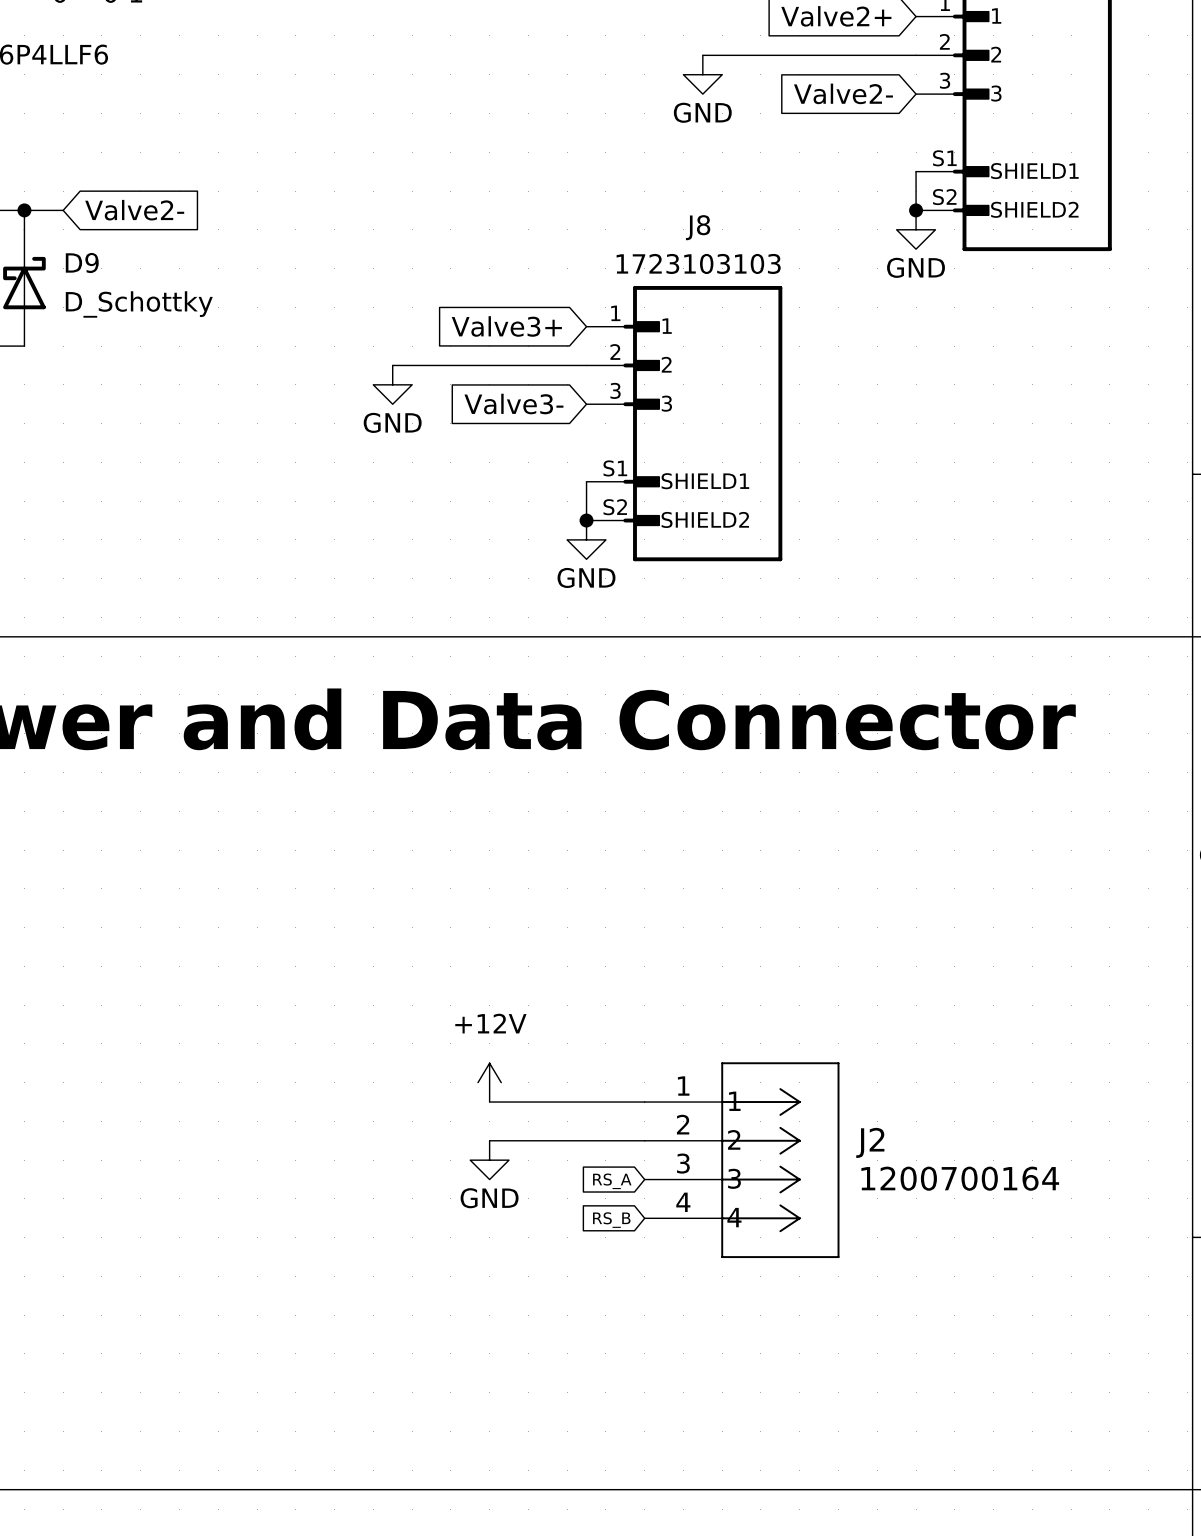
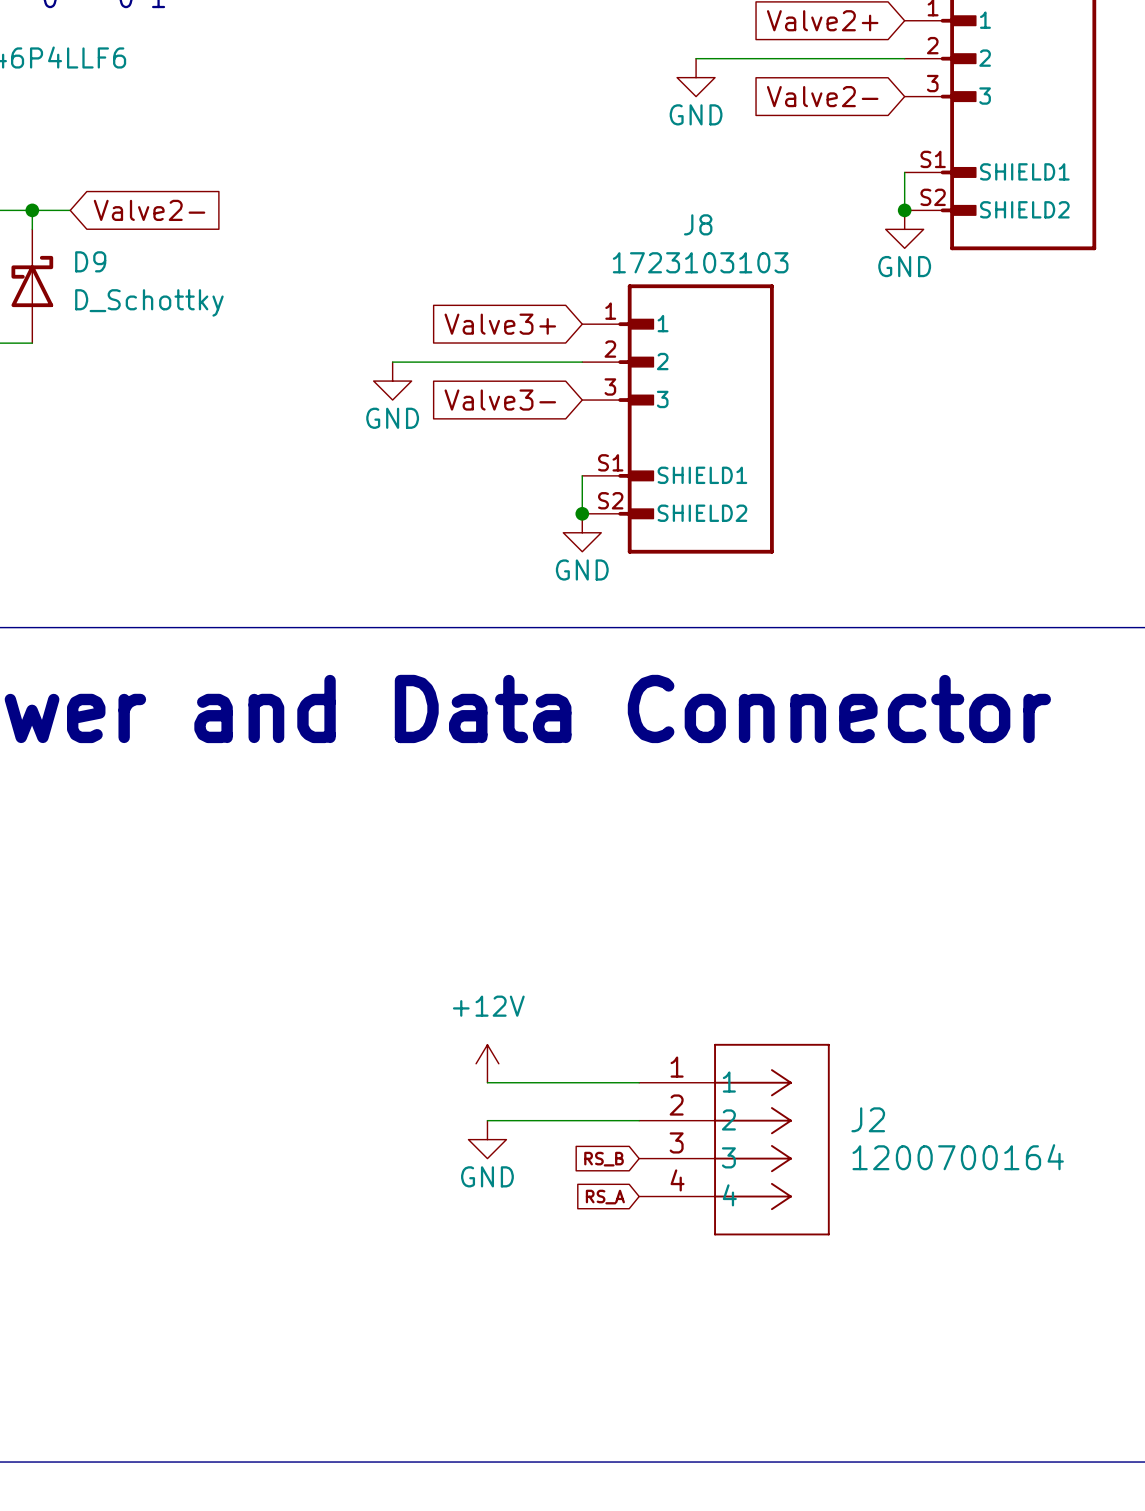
global label: RS_A (612, 1181) -> RS_B (604, 1159)
global label: RS_B (611, 1220) -> RS_A (605, 1197)

